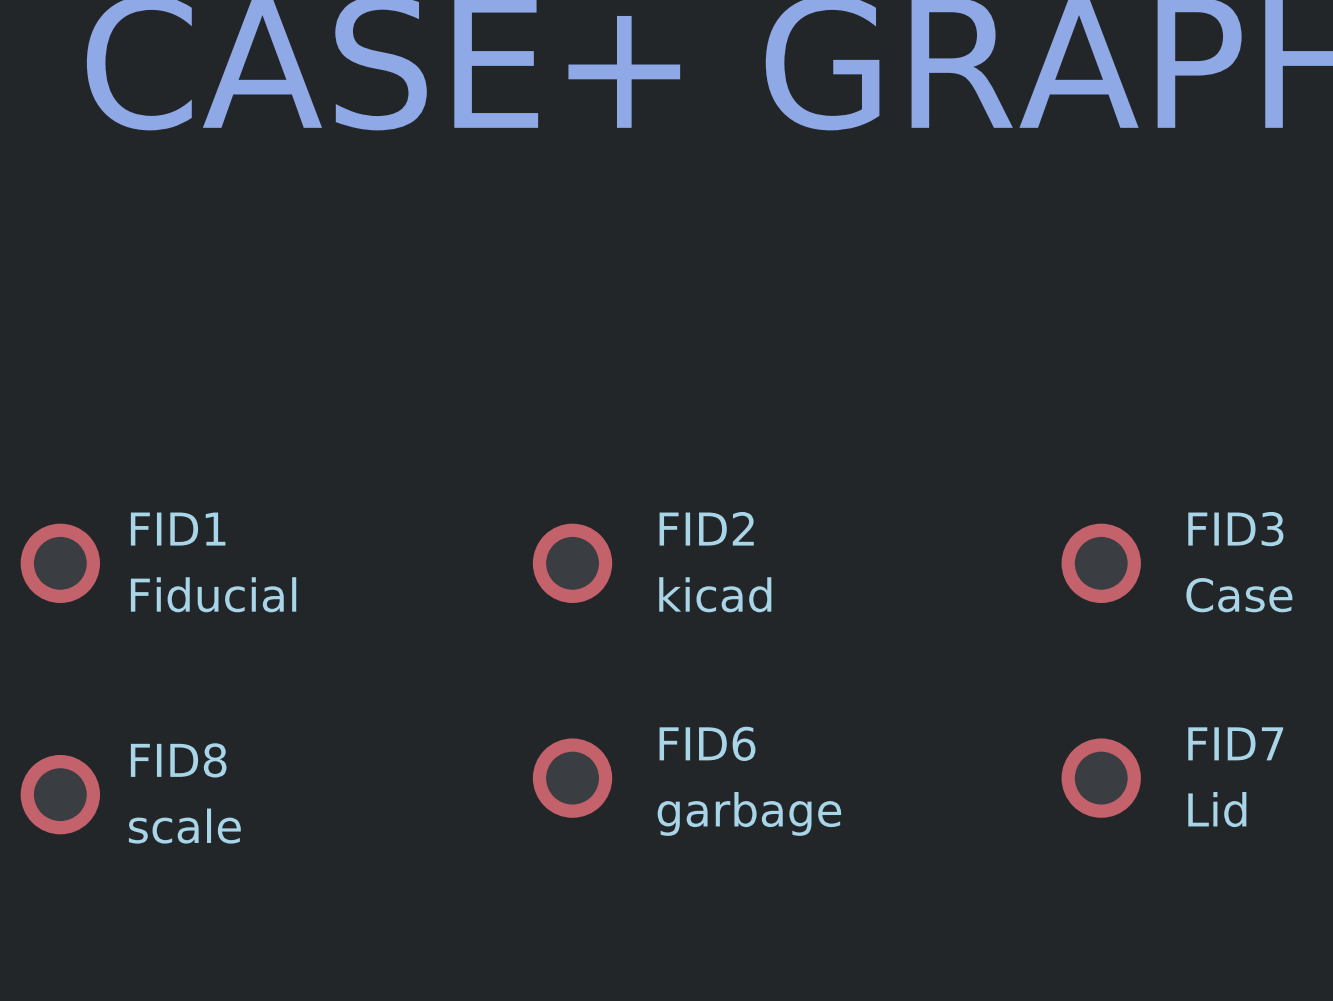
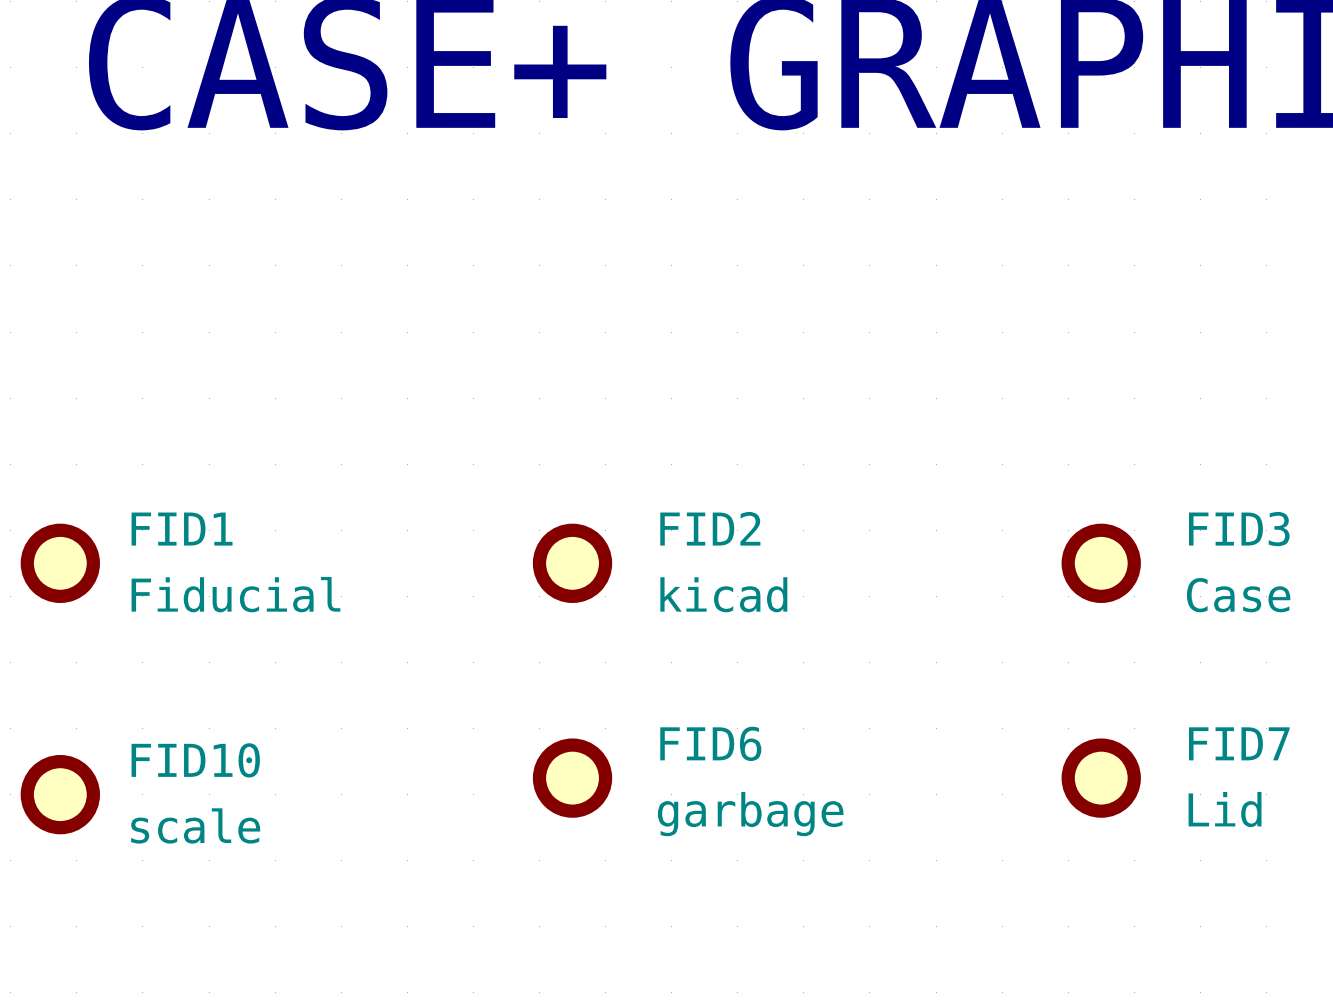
FID8 name: FID8 (178, 760) -> FID10 (195, 760)

